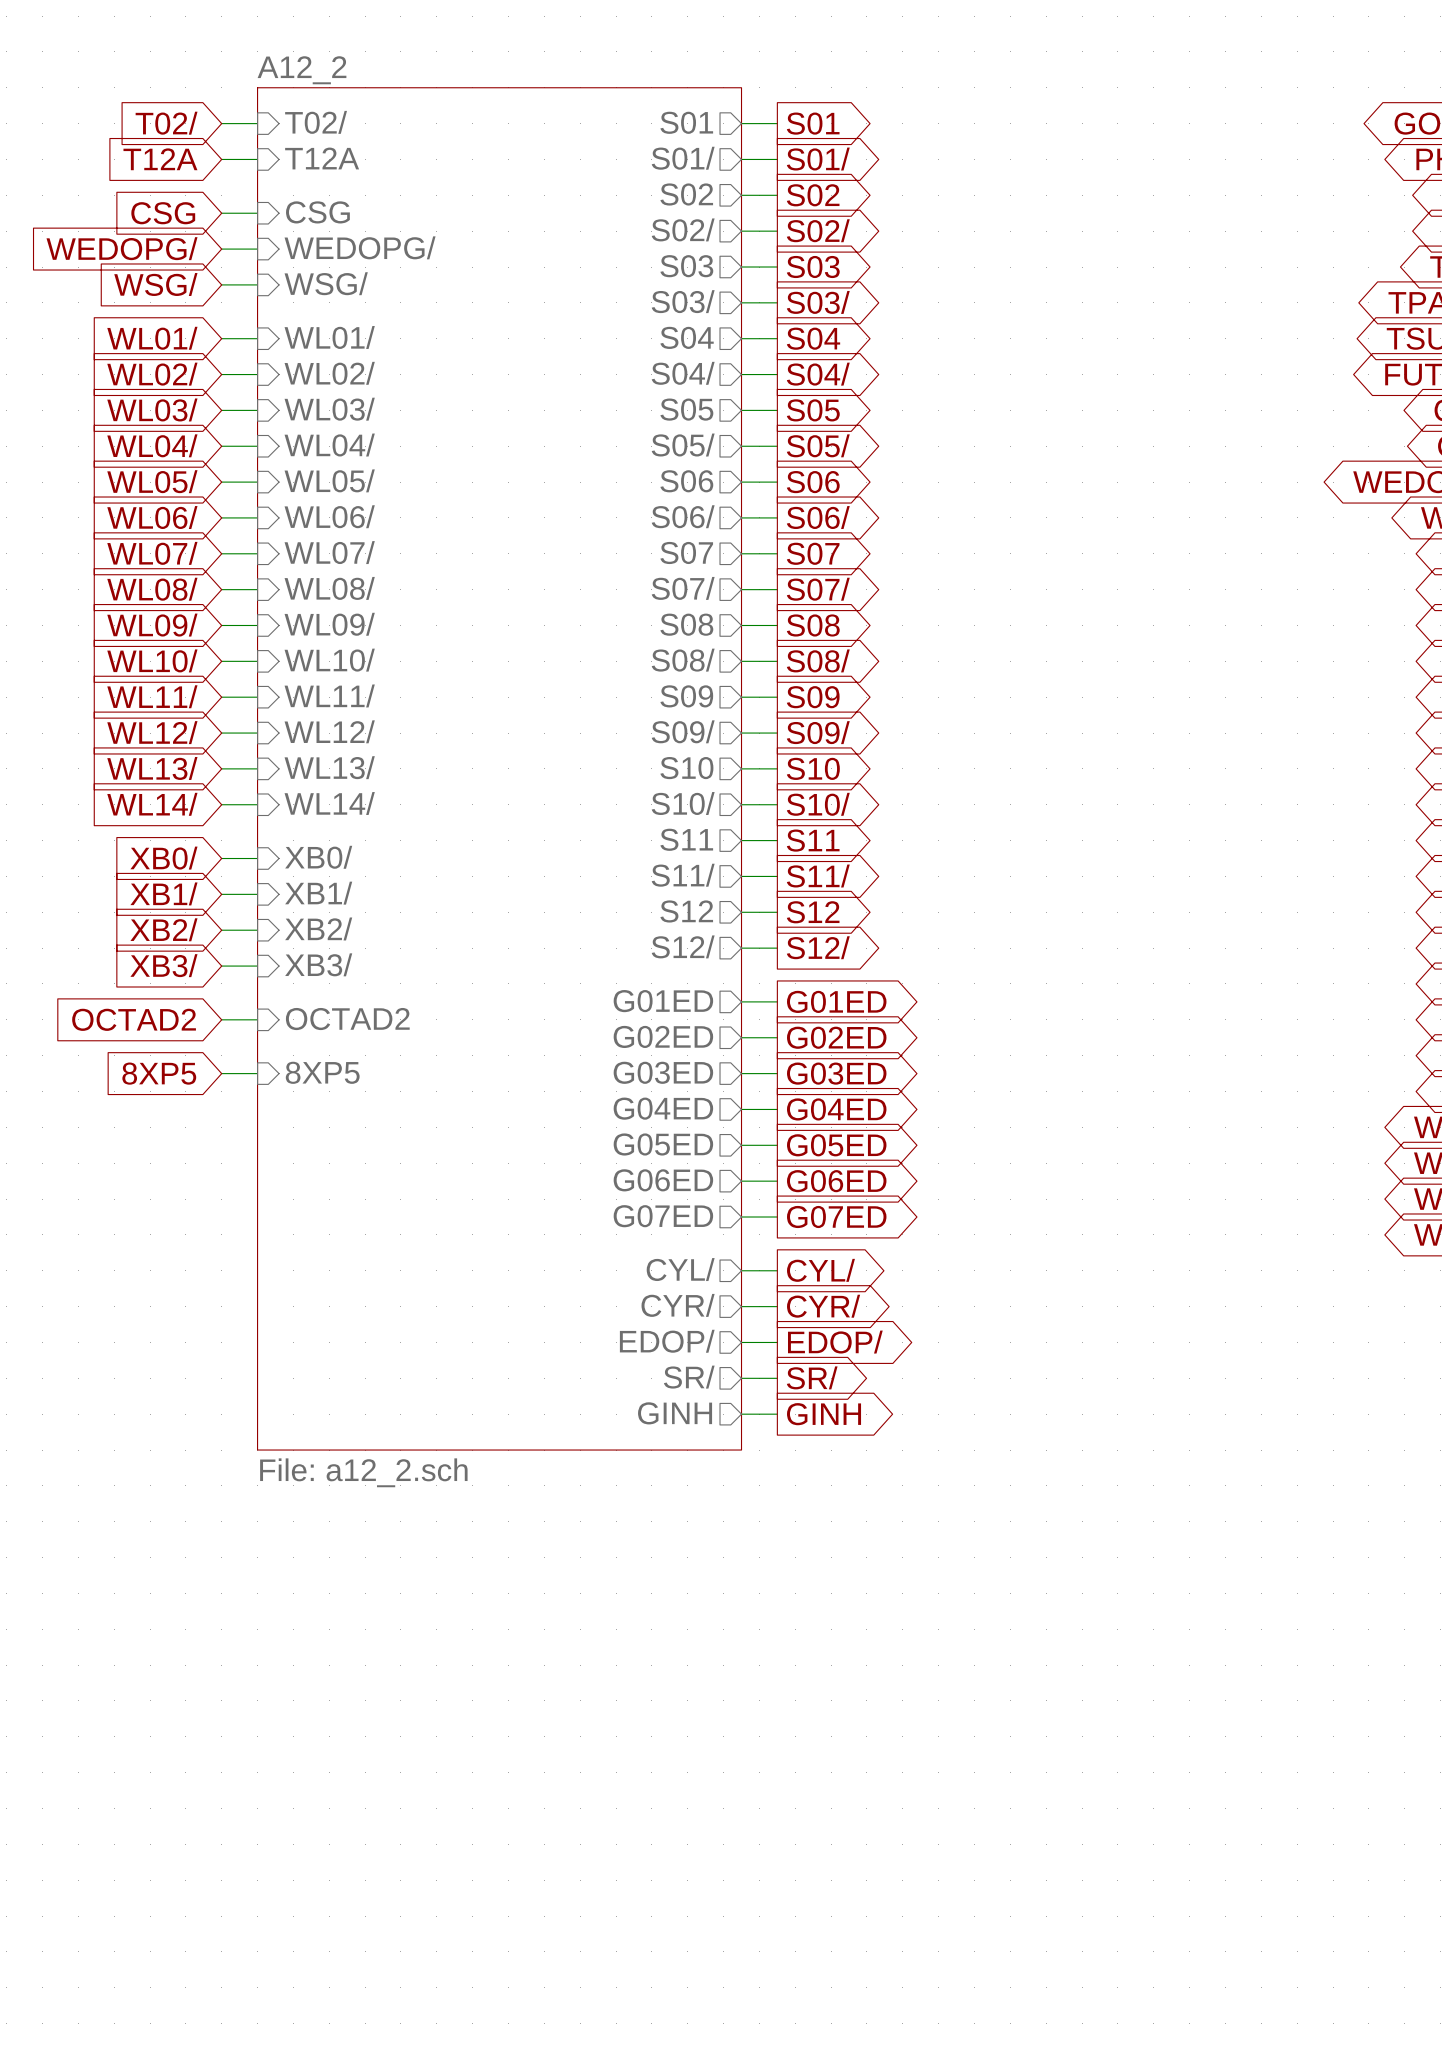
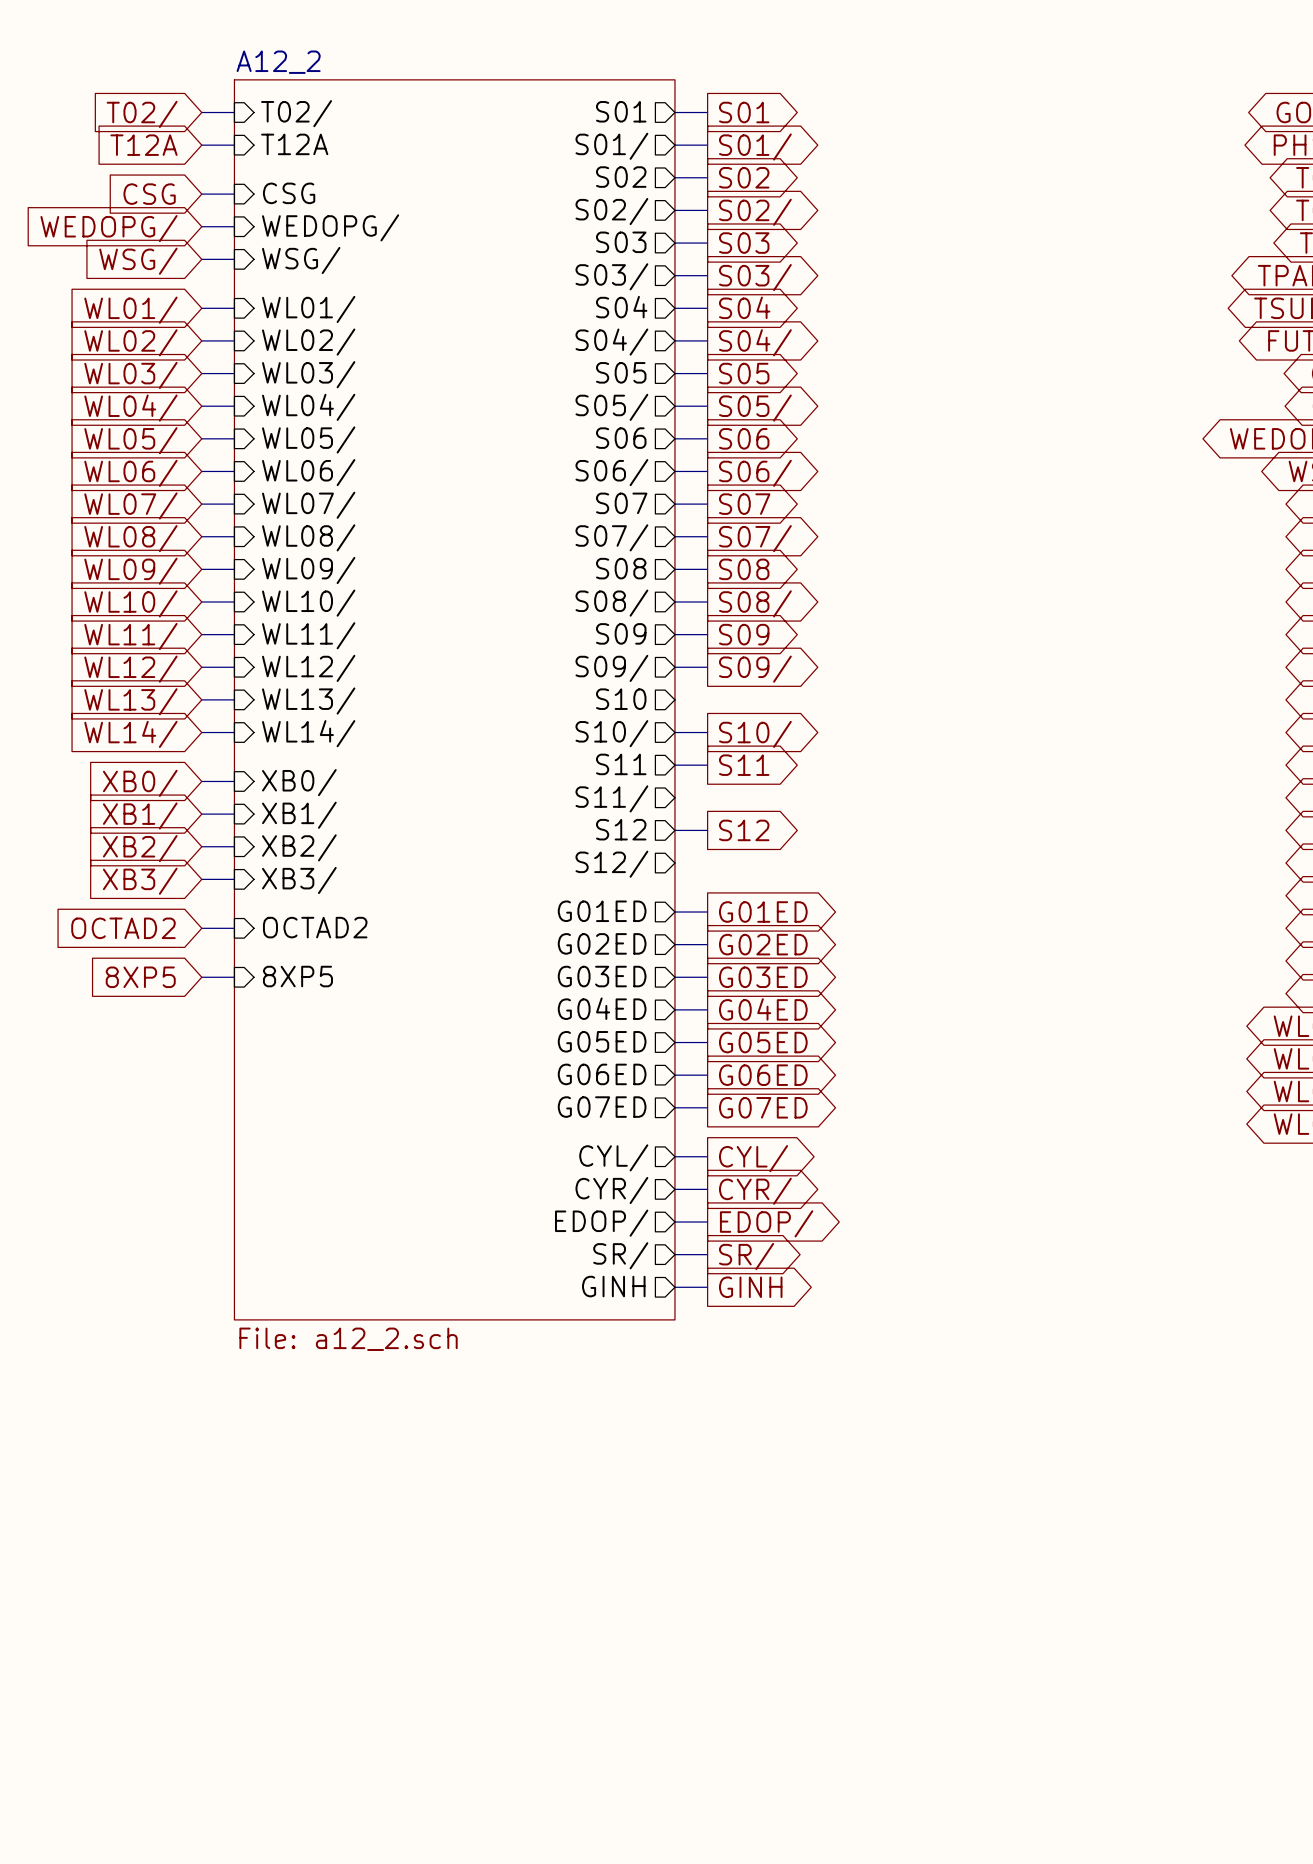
wire: (741, 768) (777, 768) -> none
global label: S10 (813, 768) -> none
wire: (741, 876) (777, 876) -> none
global label: S11/ (818, 876) -> none
global label: S12/ (818, 947) -> none
wire: (741, 948) (777, 948) -> none

